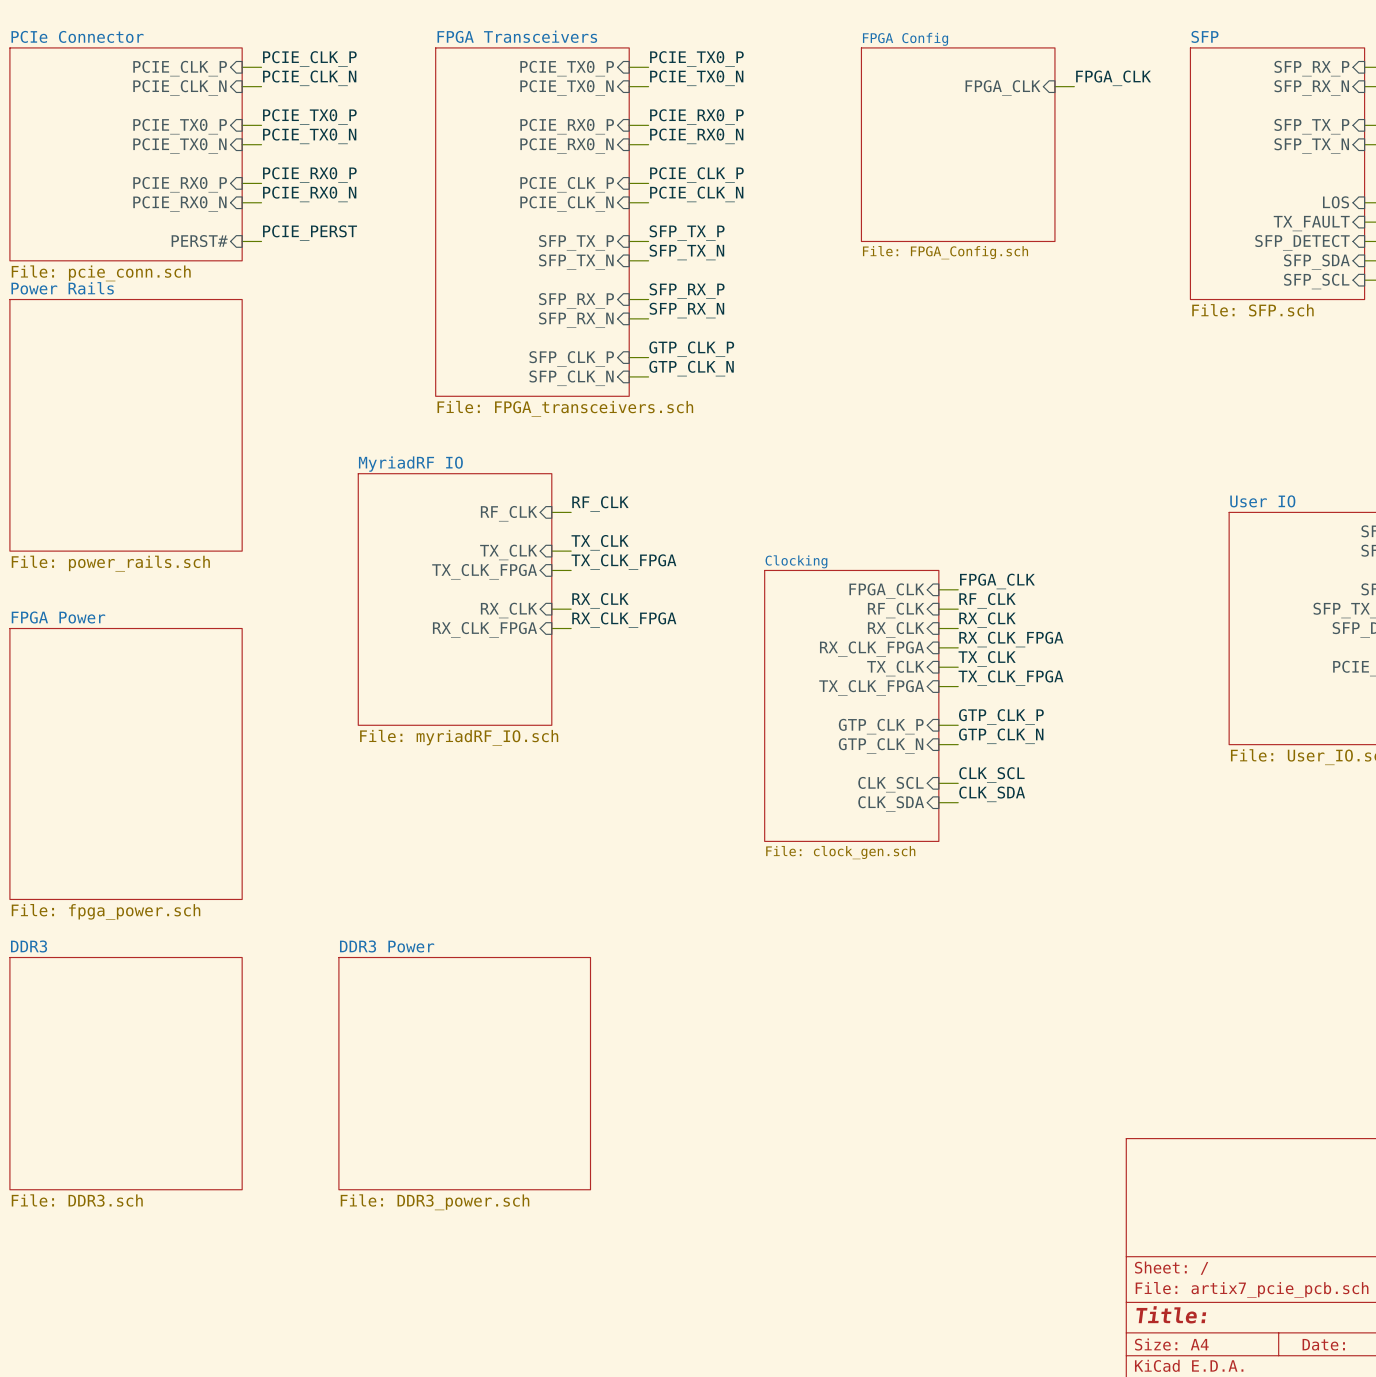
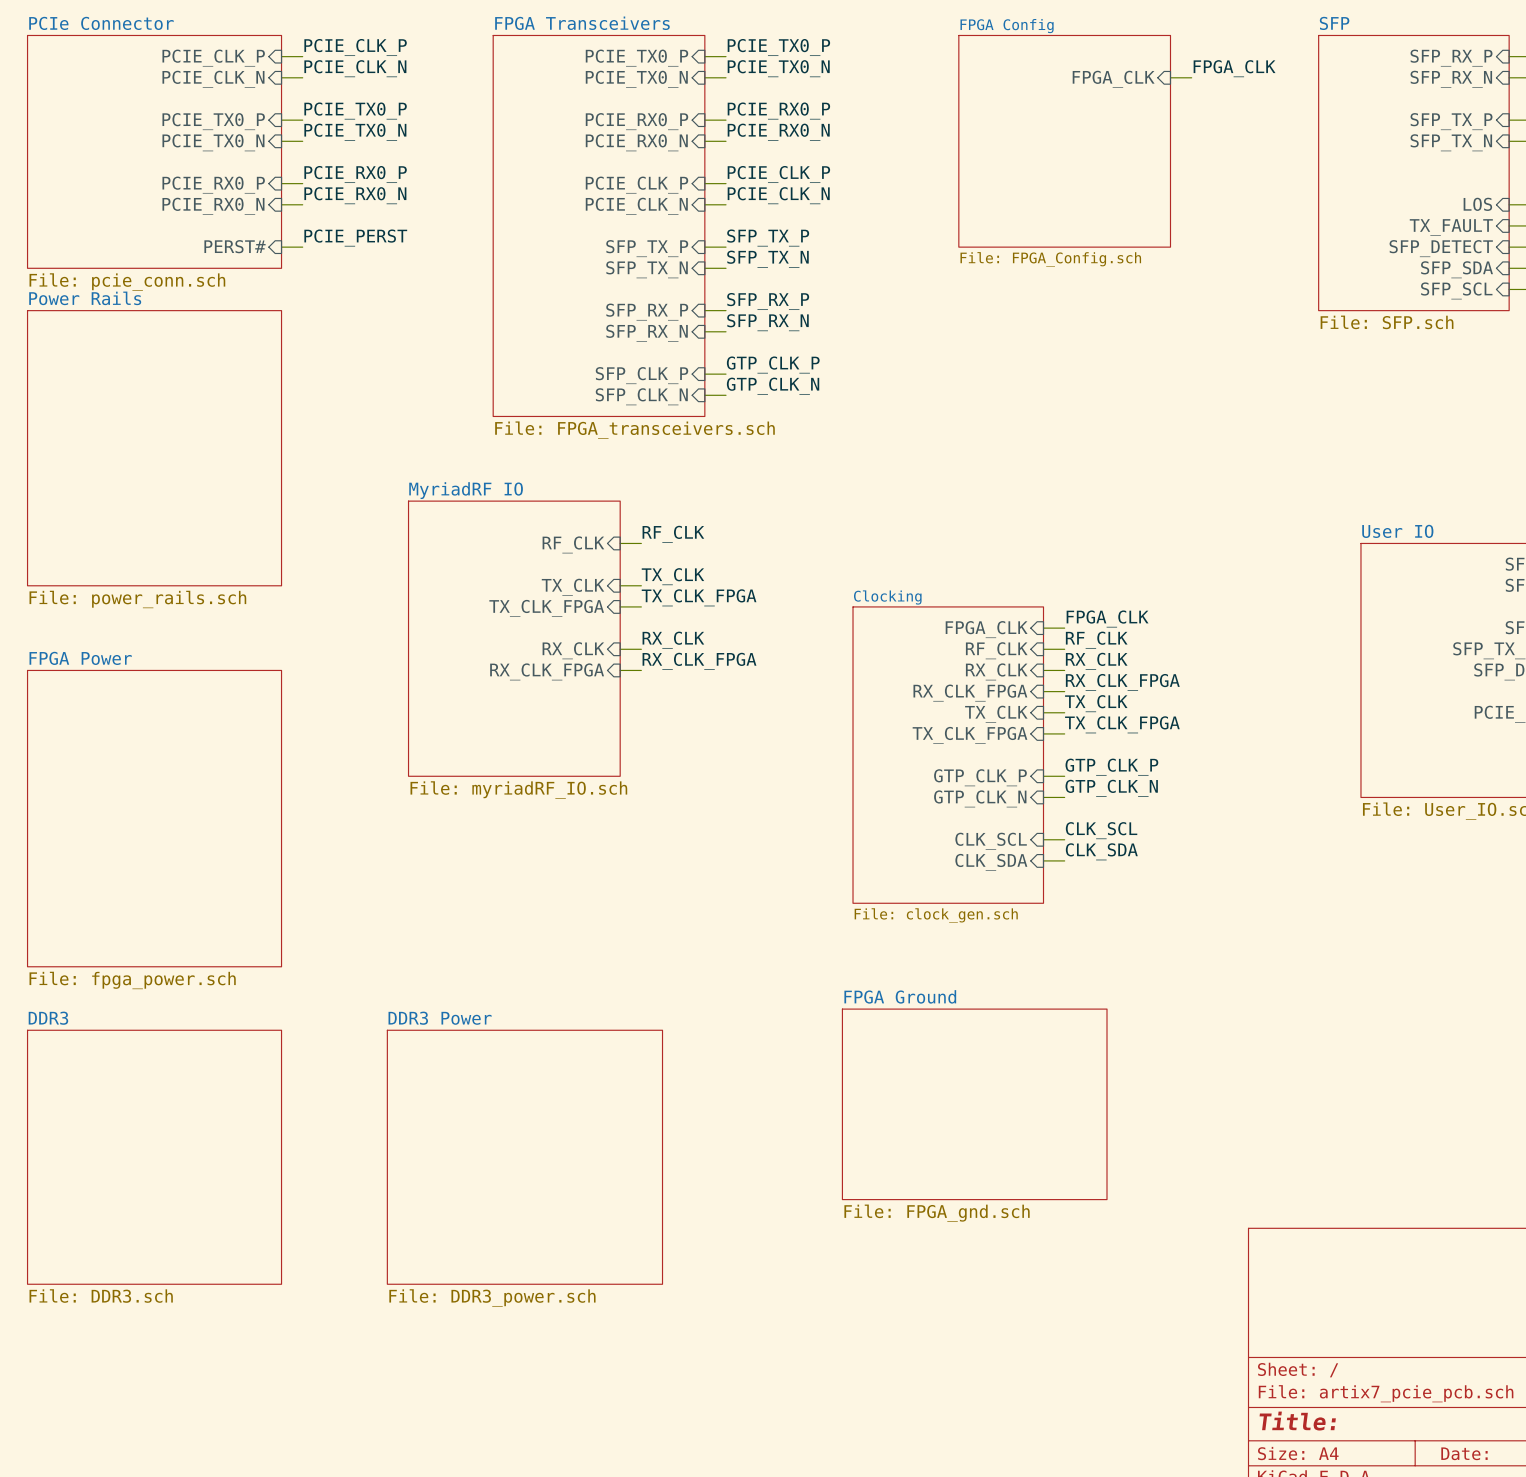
sheet FPGA Ground: none -> File: FPGA_gnd.sch (974, 1104)

